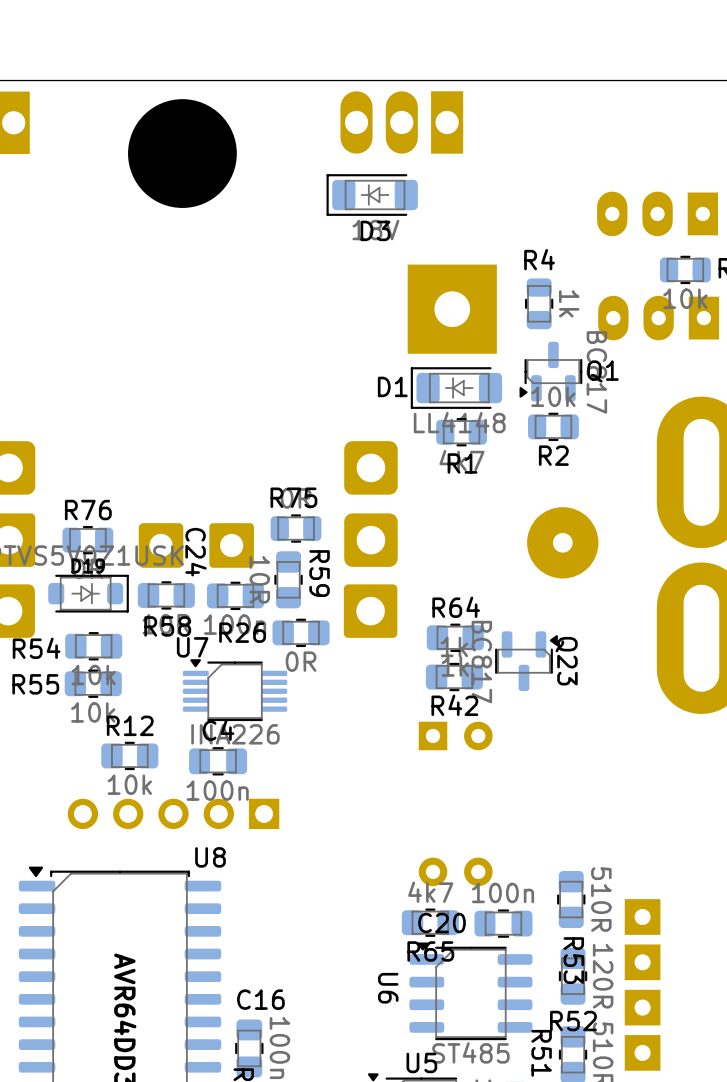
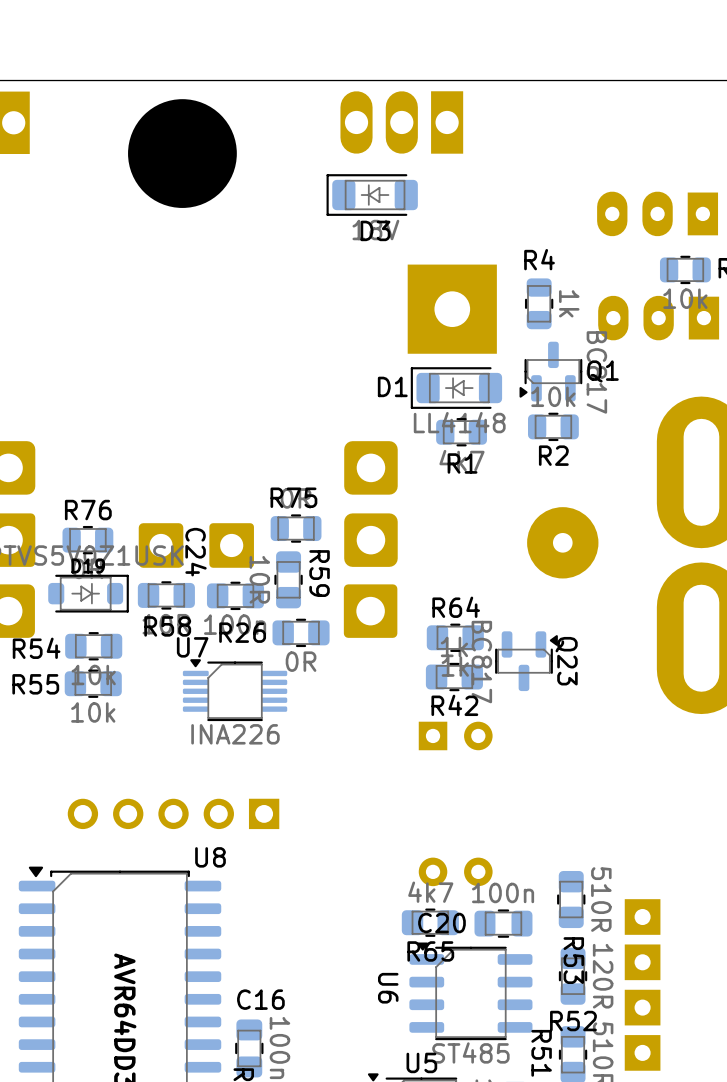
R12: 10k (129, 755) -> none
C4: 100n (218, 761) -> none

